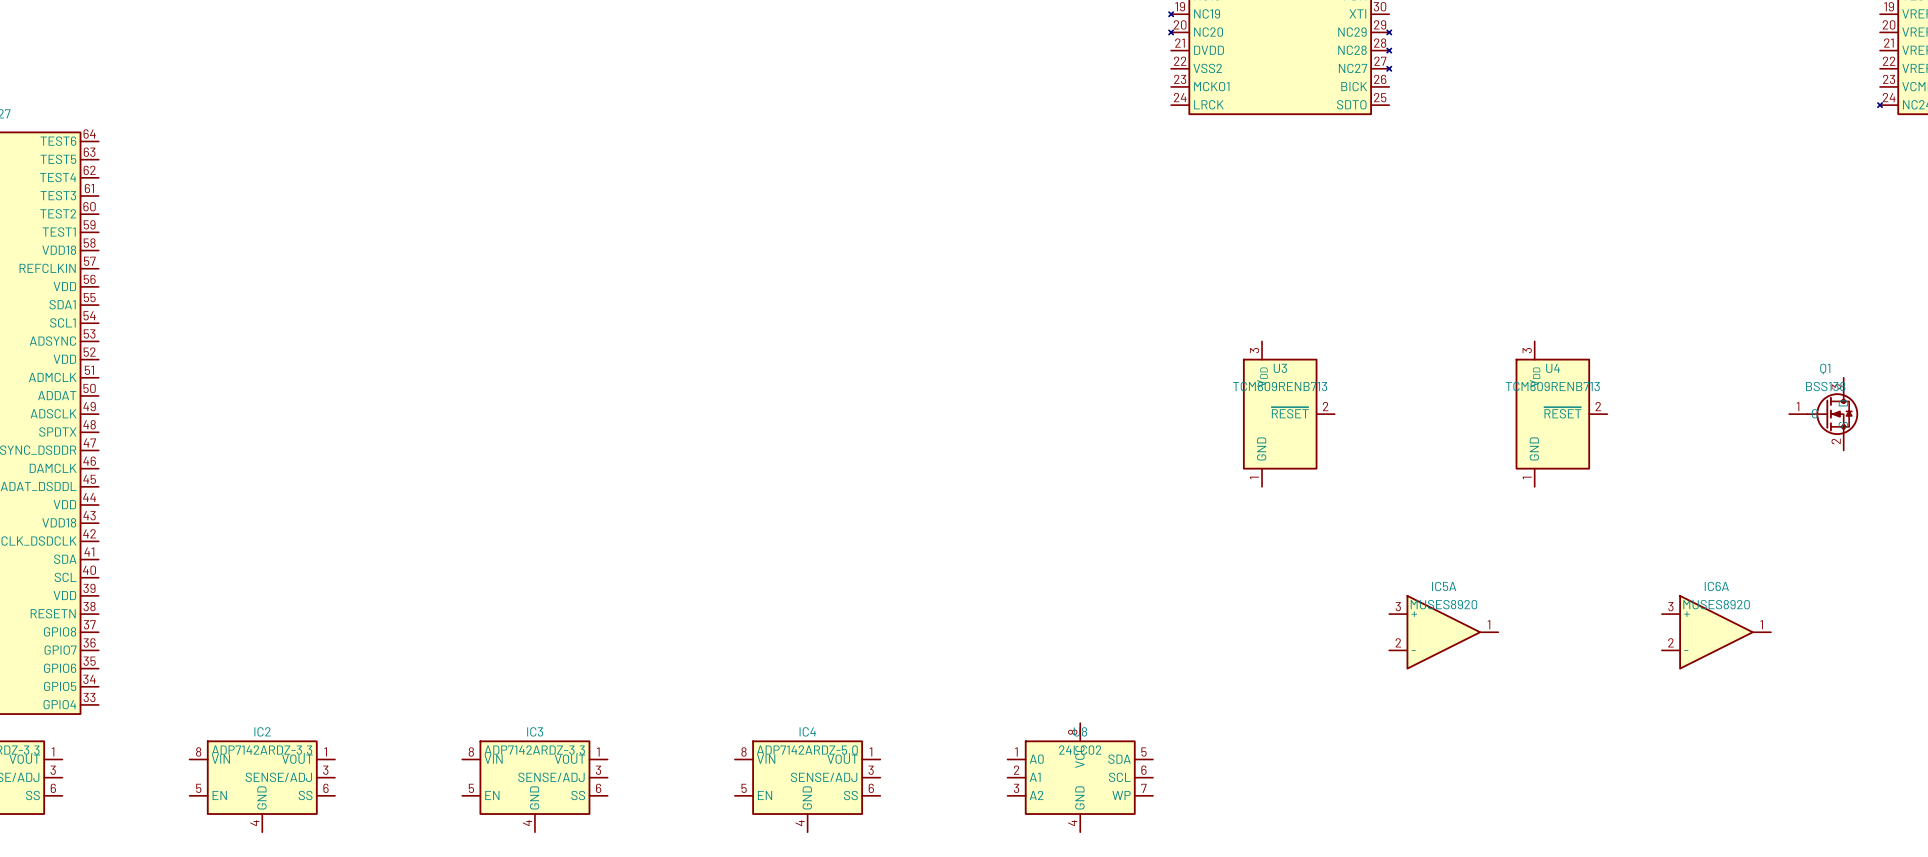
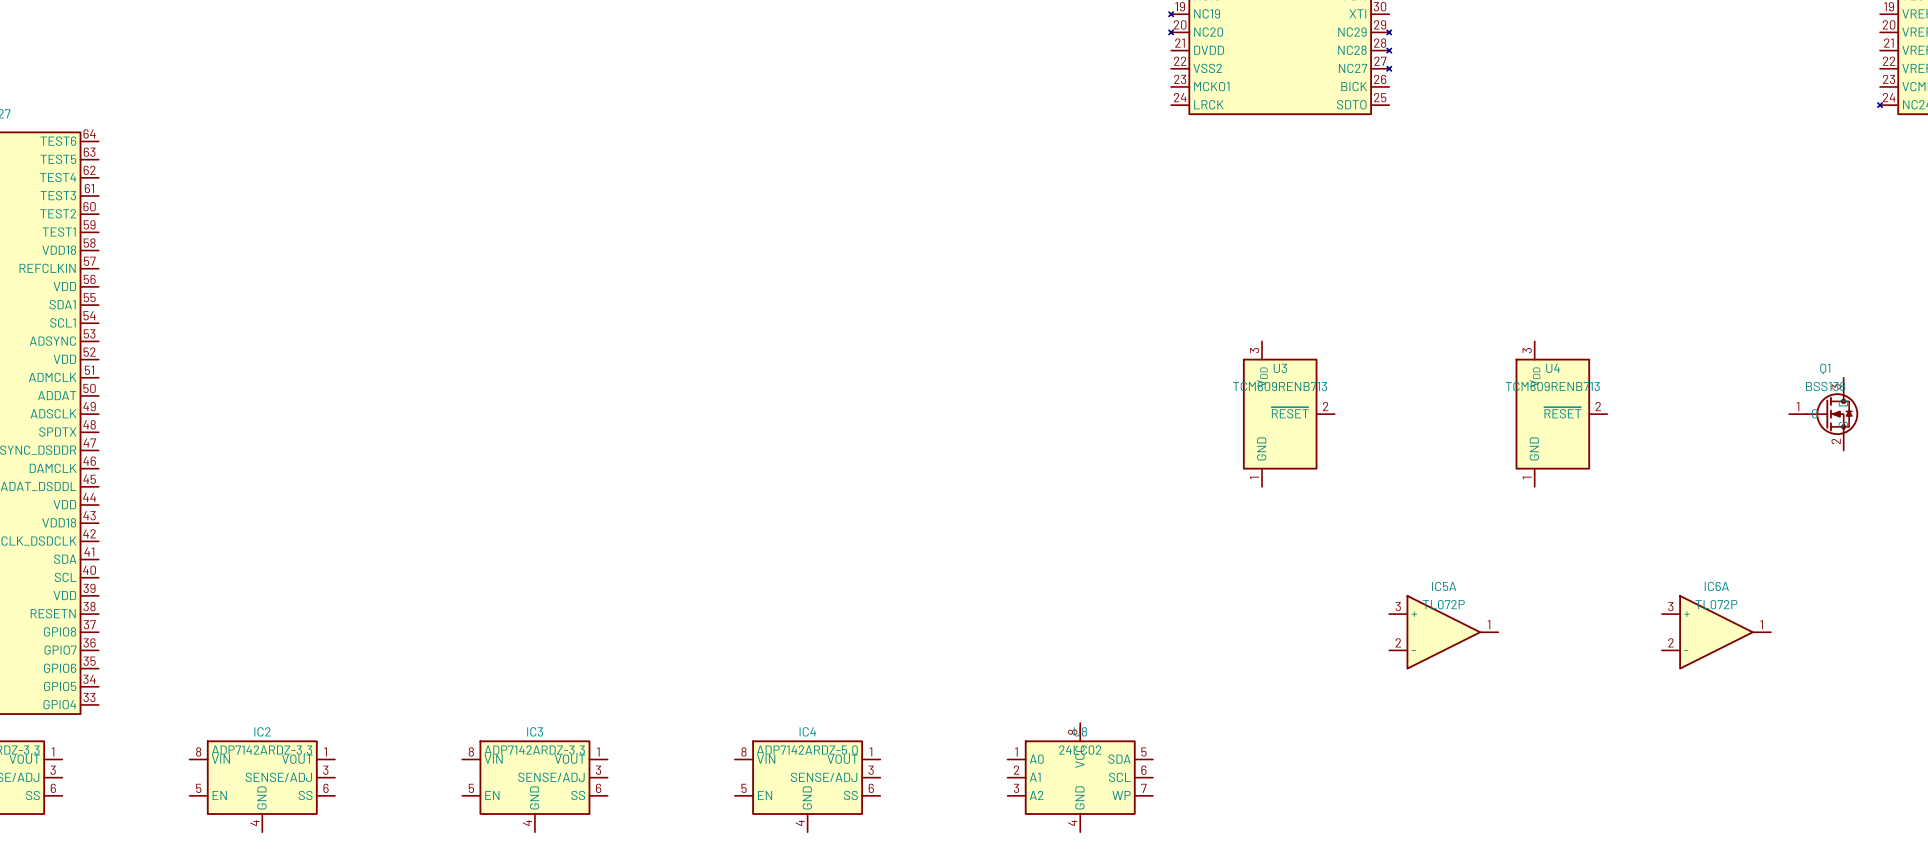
IC5A value: MUSES8920 (1443, 604) -> TL072P (1443, 604)
IC6A value: MUSES8920 (1716, 604) -> TL072P (1716, 604)

